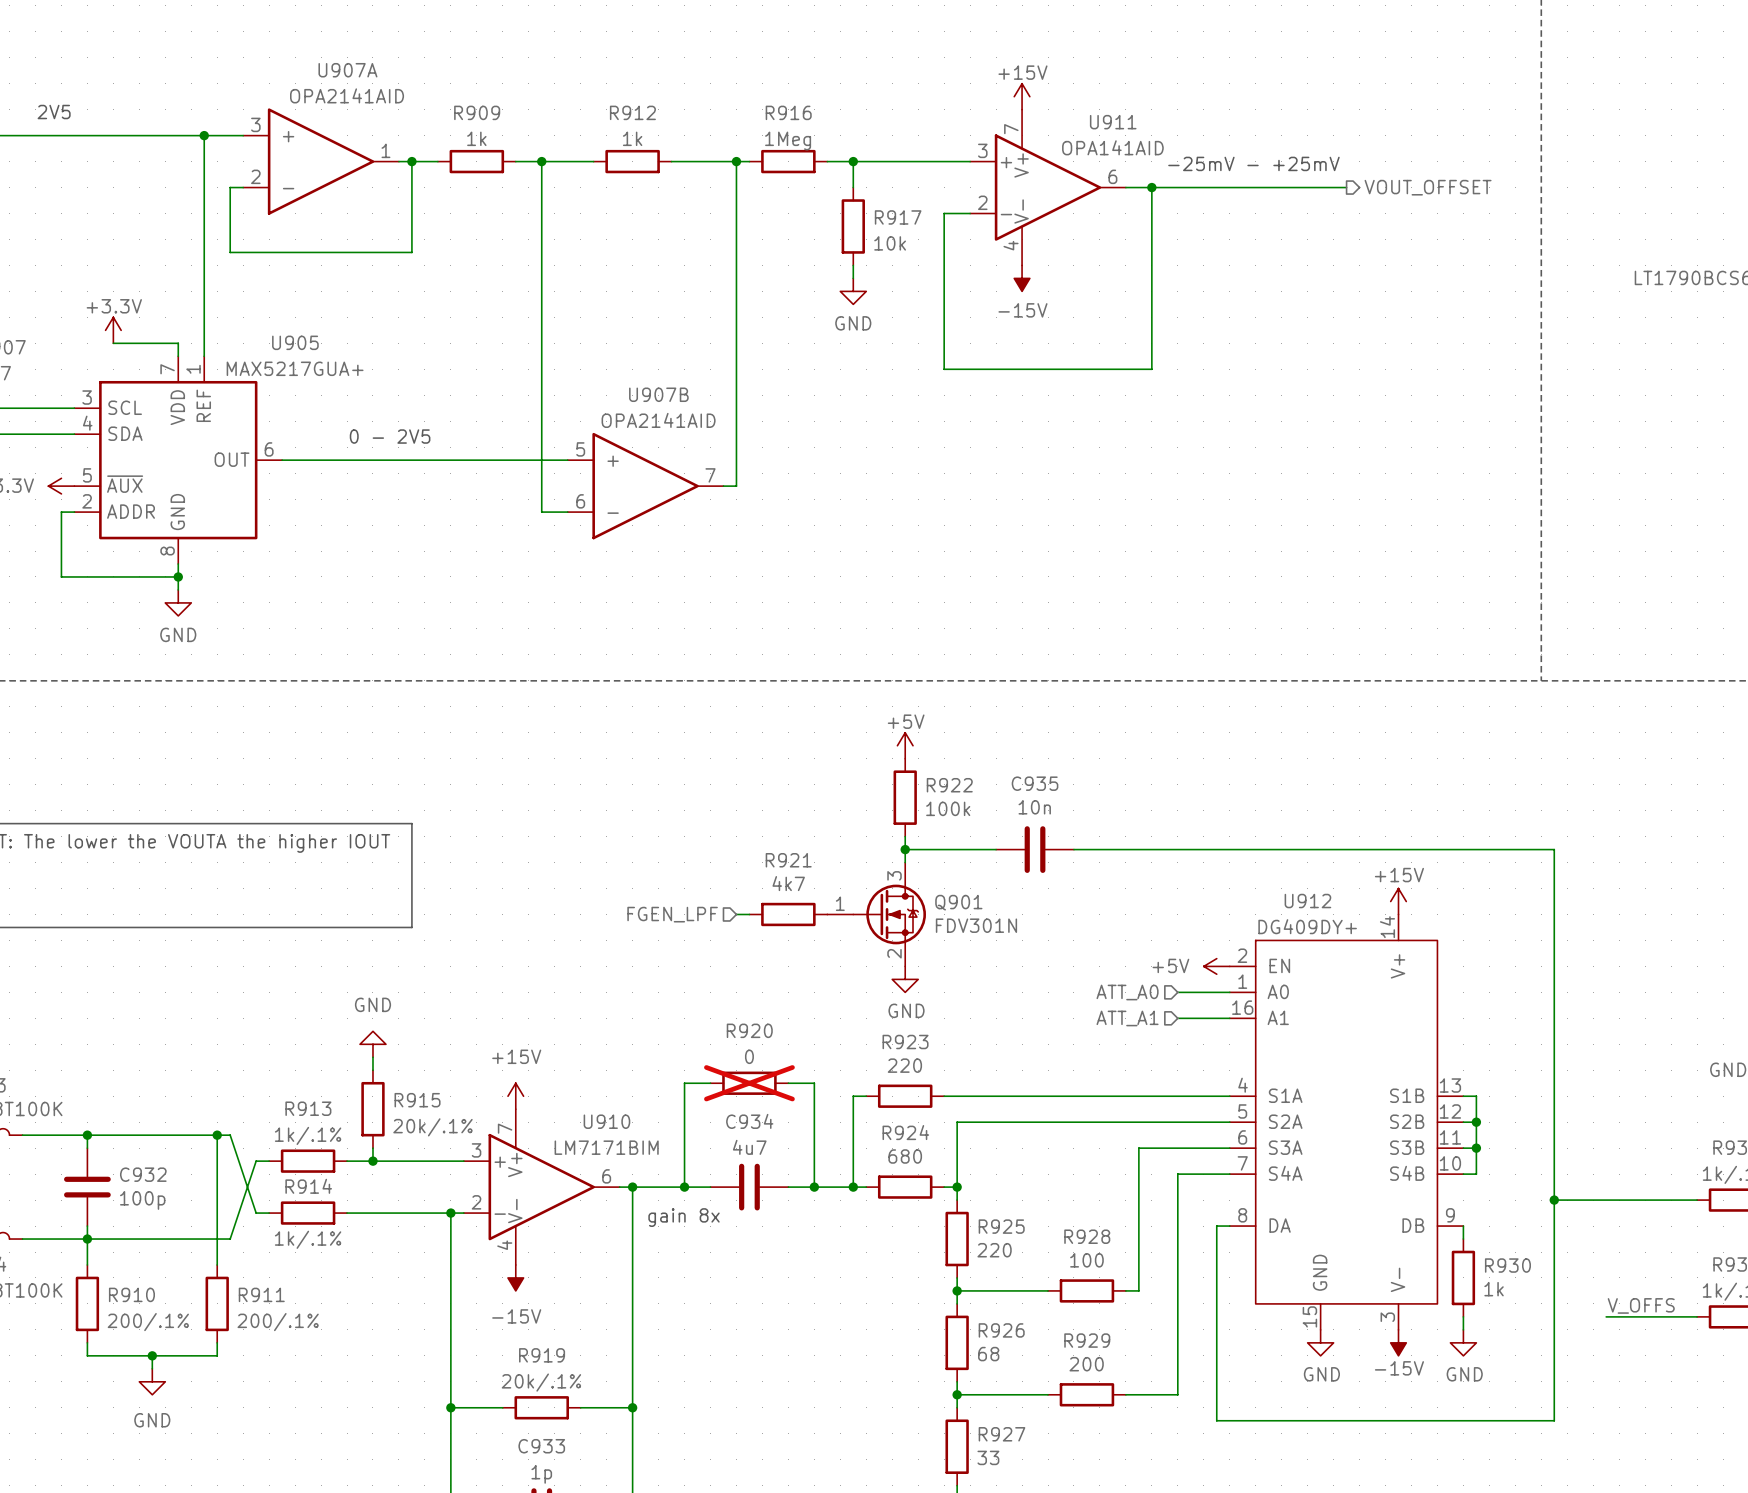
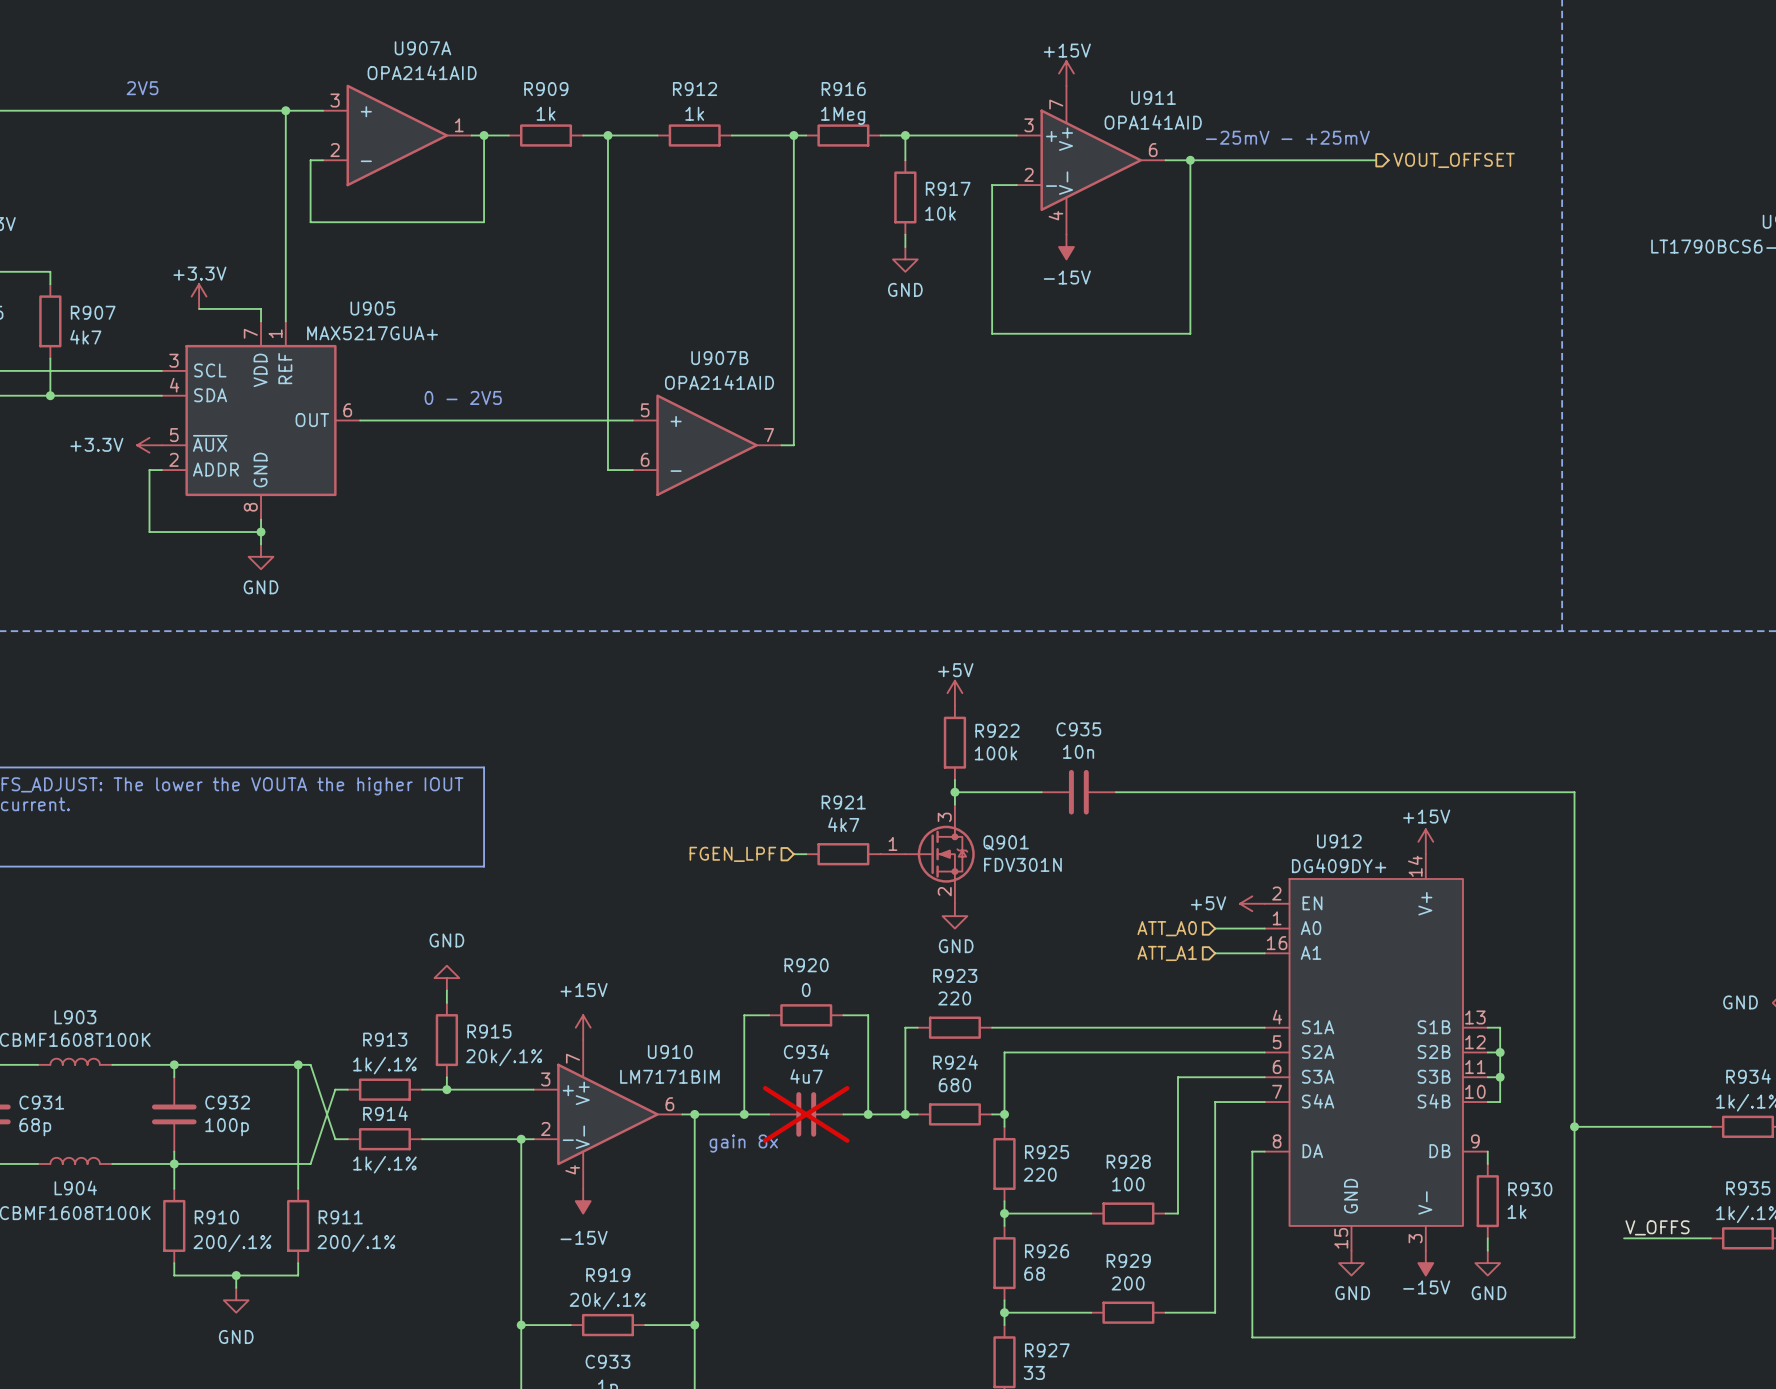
R920 do-not-place cross: (749, 1083) -> none
C934 do-not-place cross: none -> (806, 1114)

